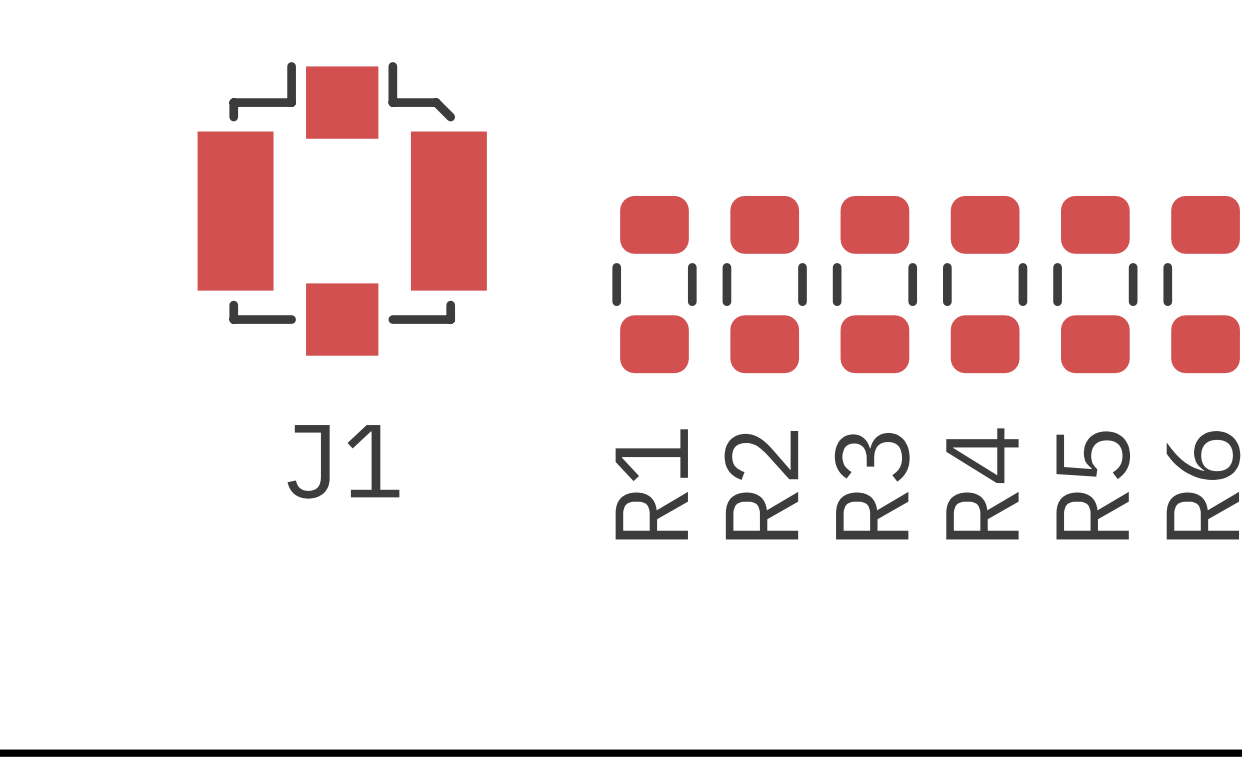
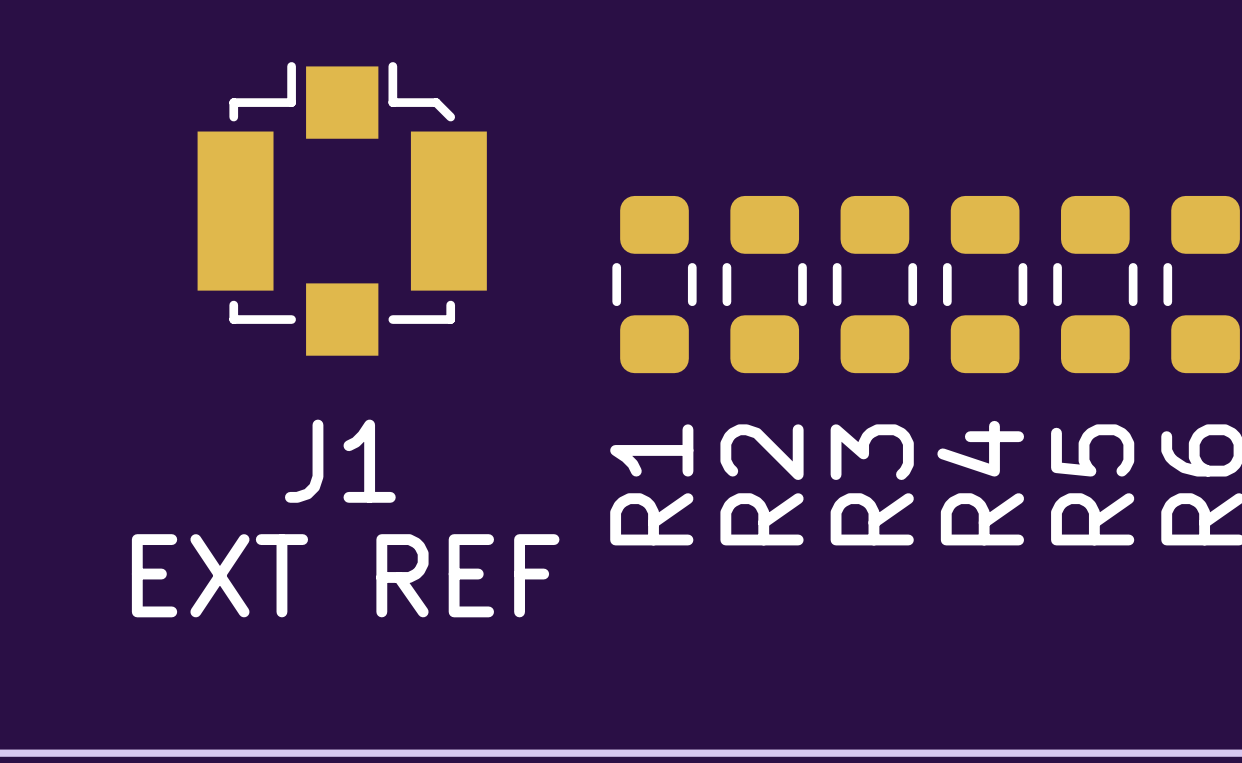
text: none -> EXT REF (345, 575)

